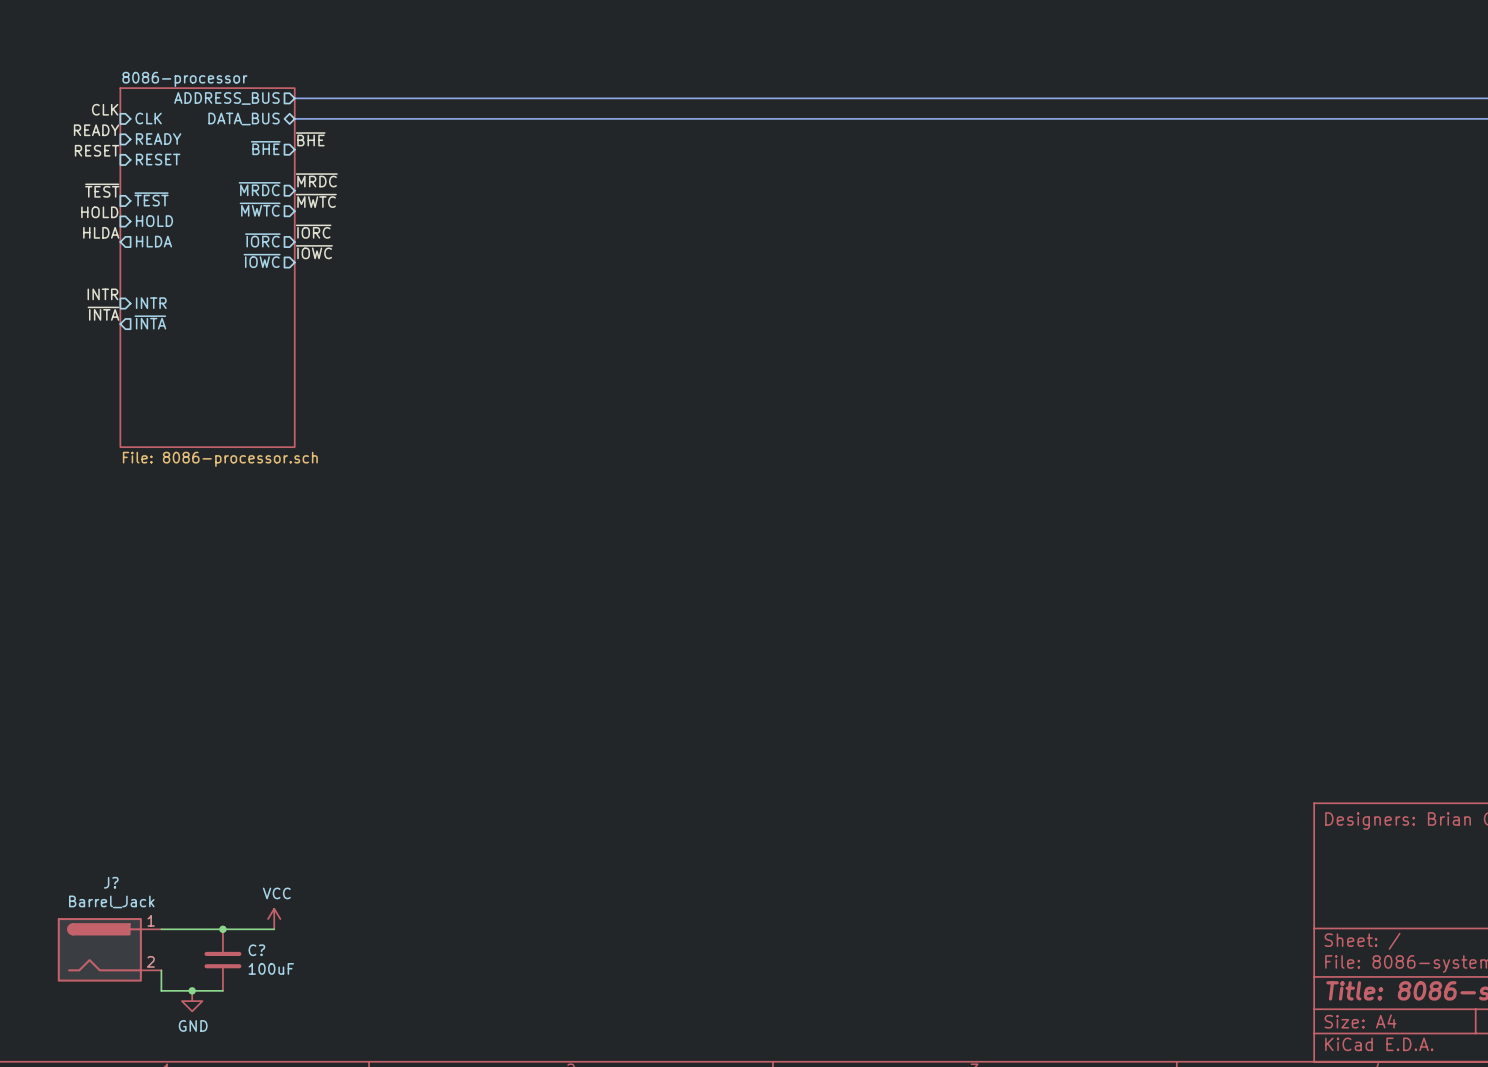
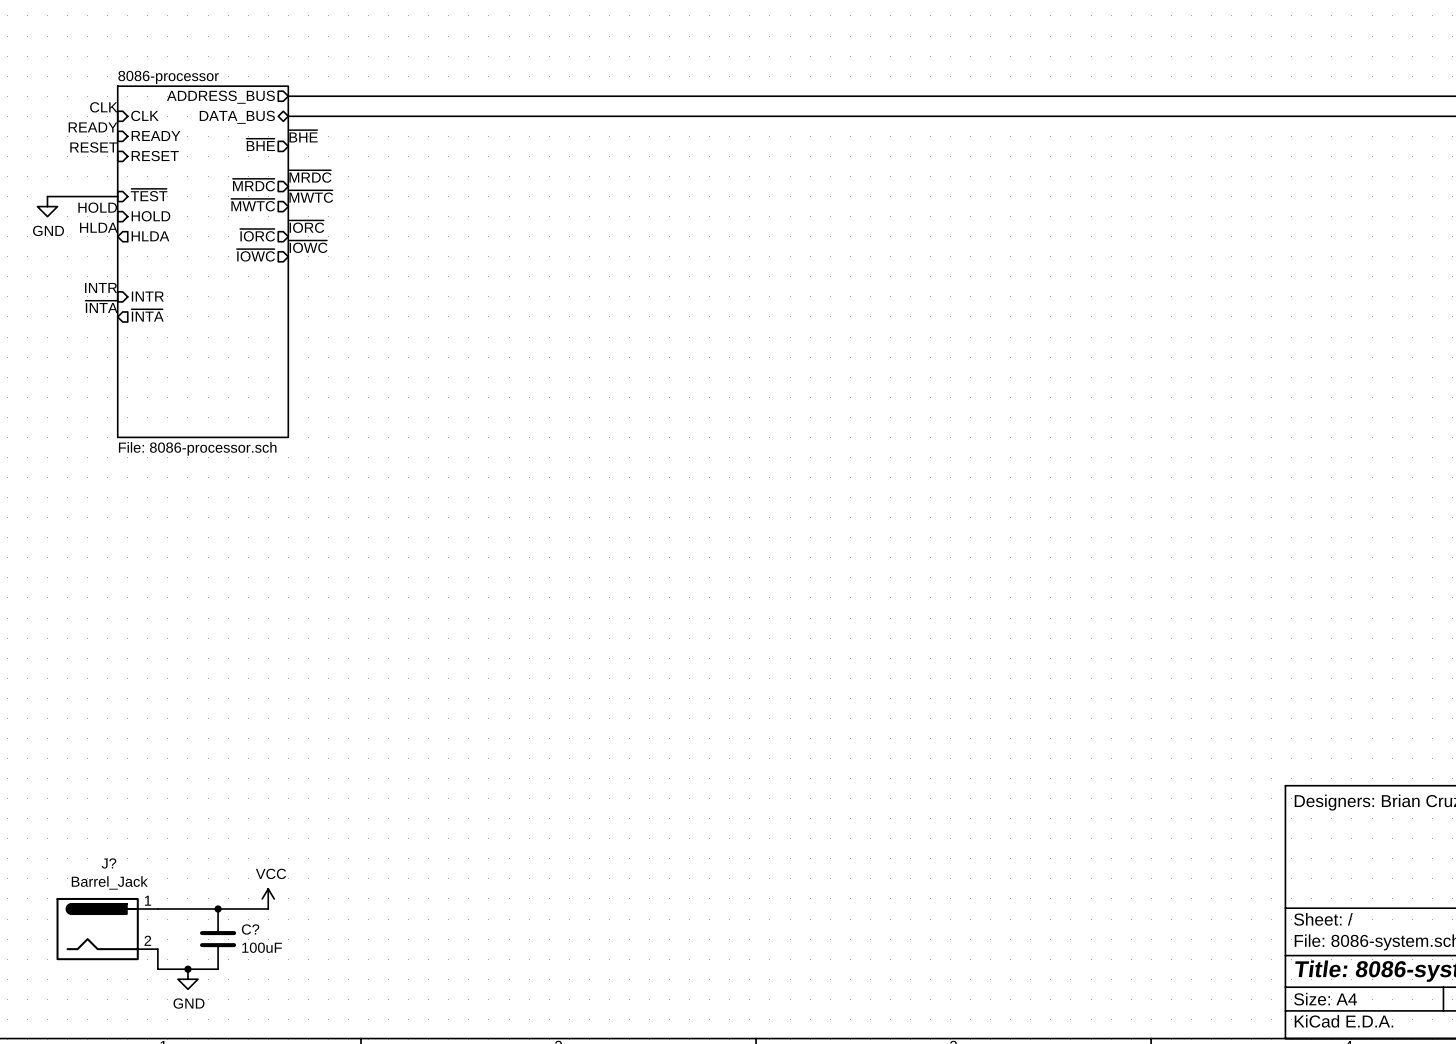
label: ~{TEST} (102, 190) -> none
wire: none -> (47, 196) (117, 196)
power symbol: none -> GND (47, 206)

